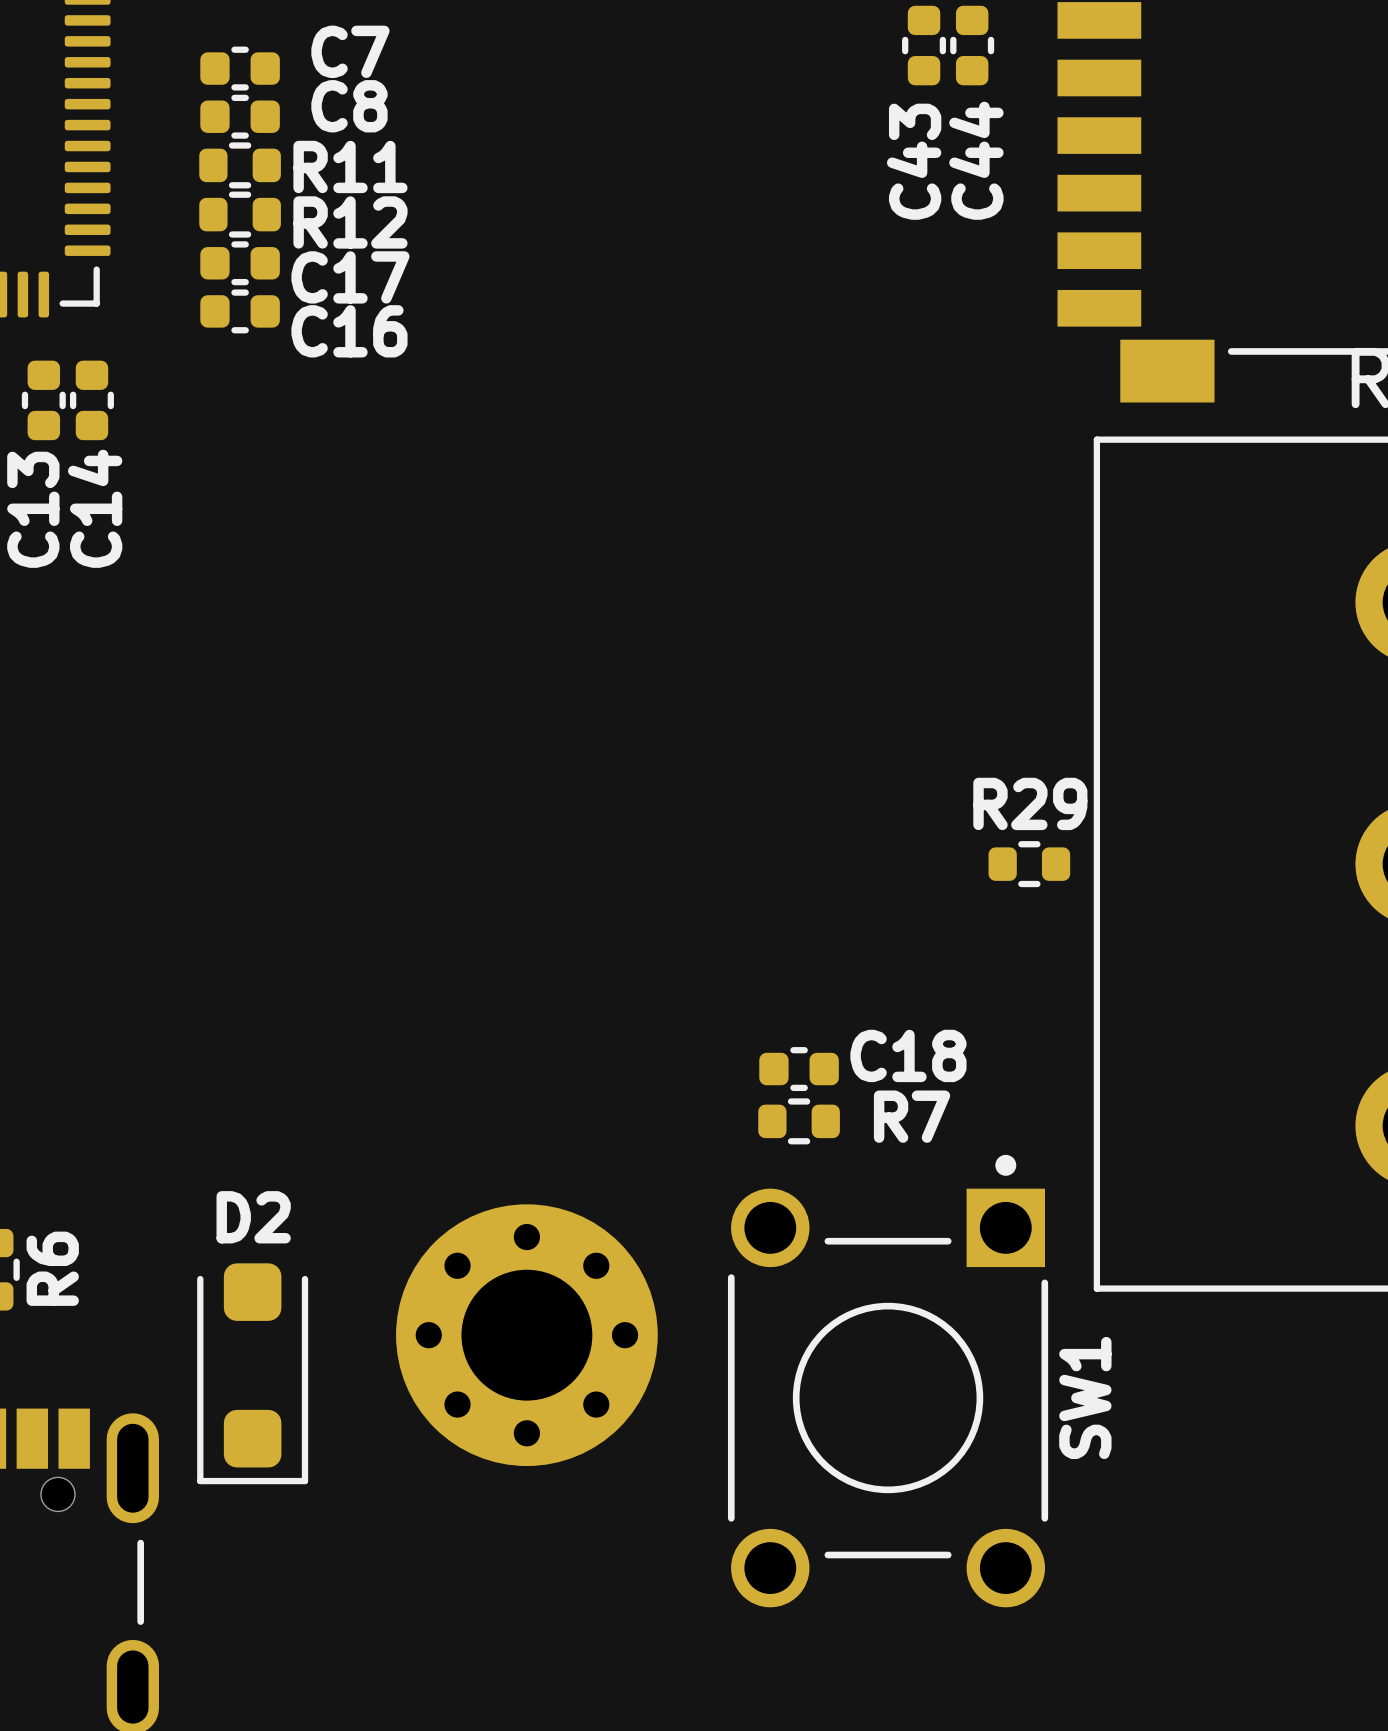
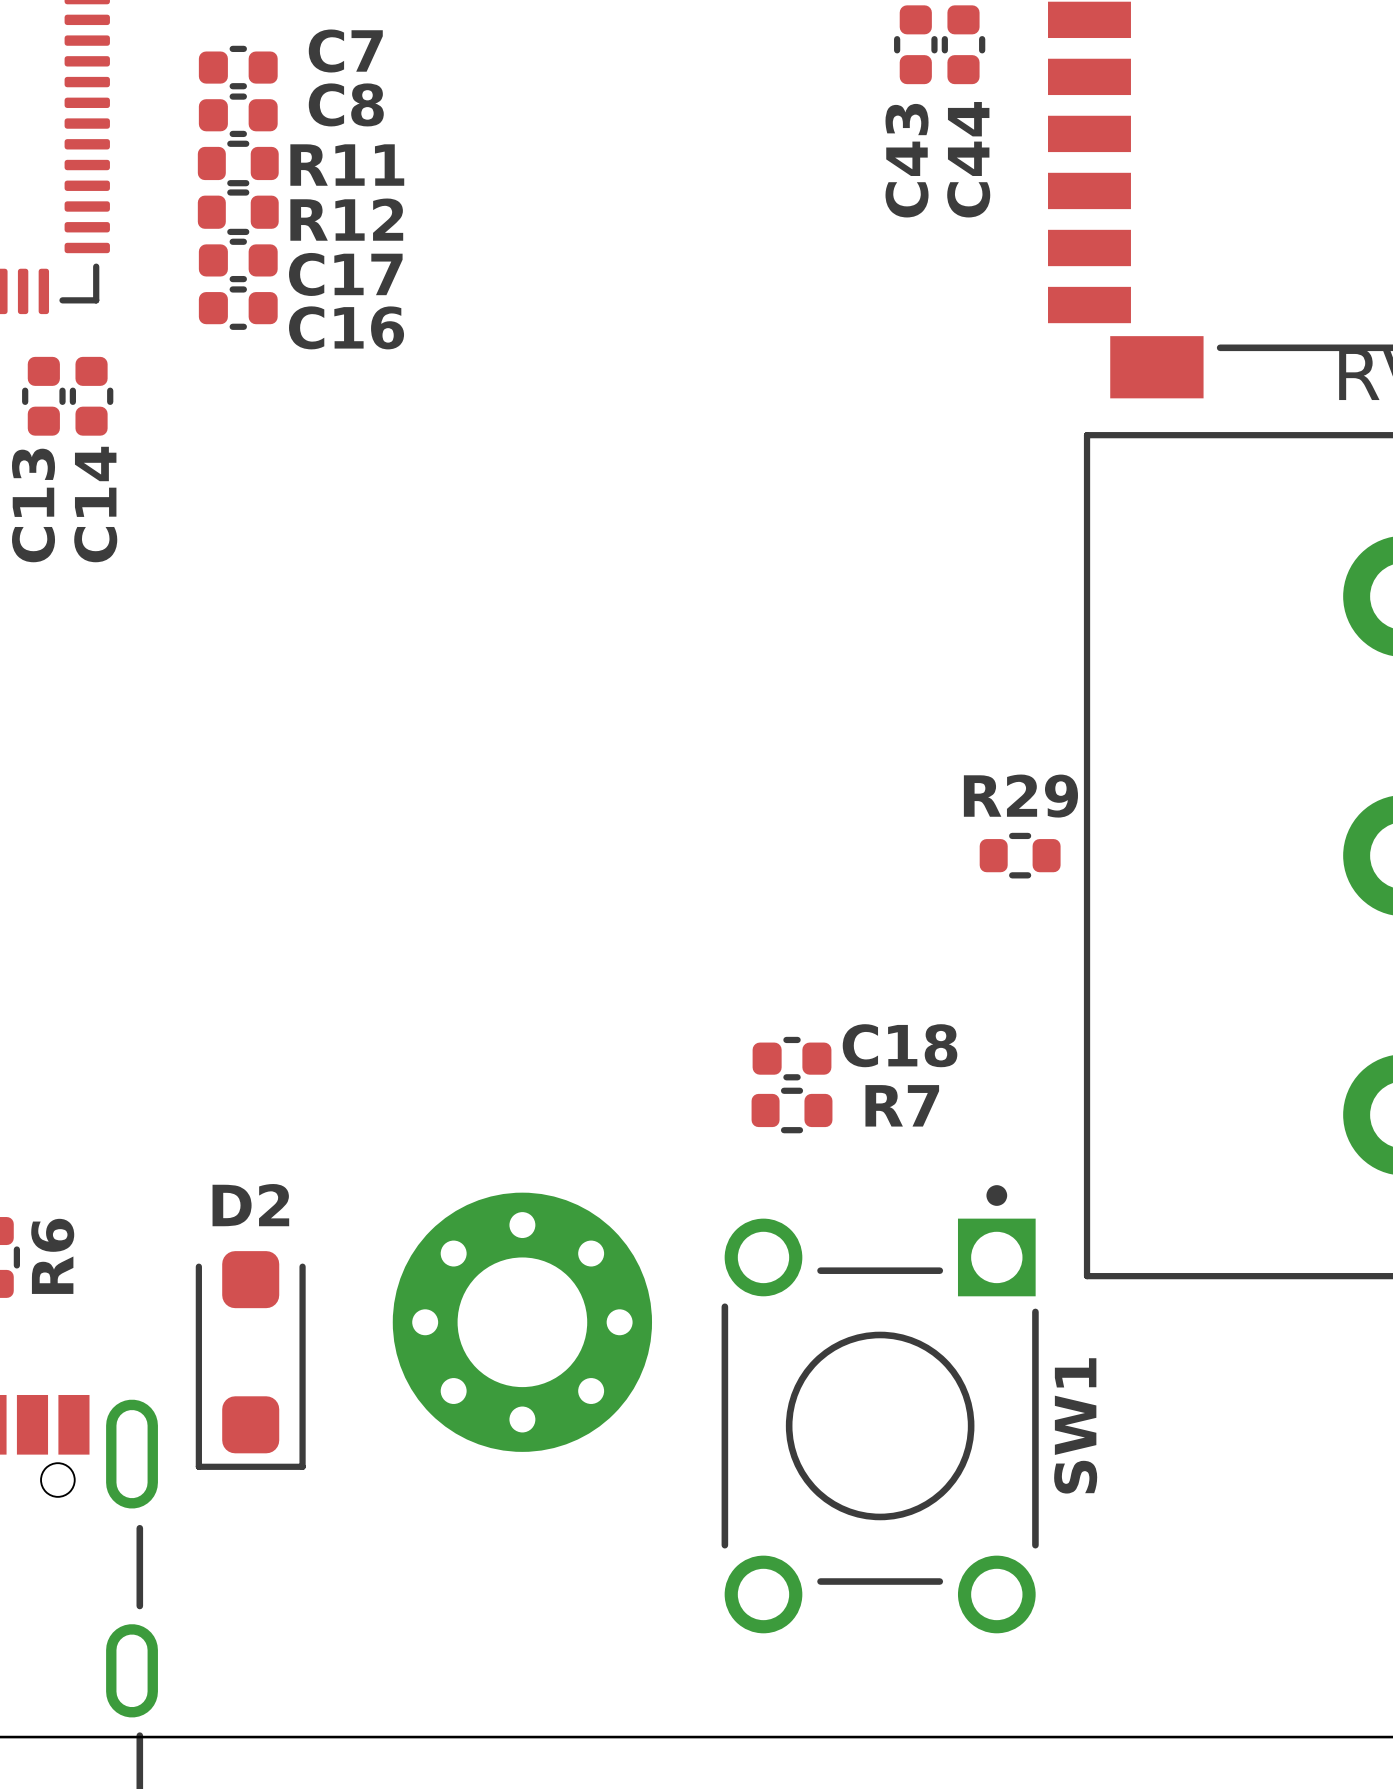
SW1 position: (888, 1381) -> (880, 1409)

